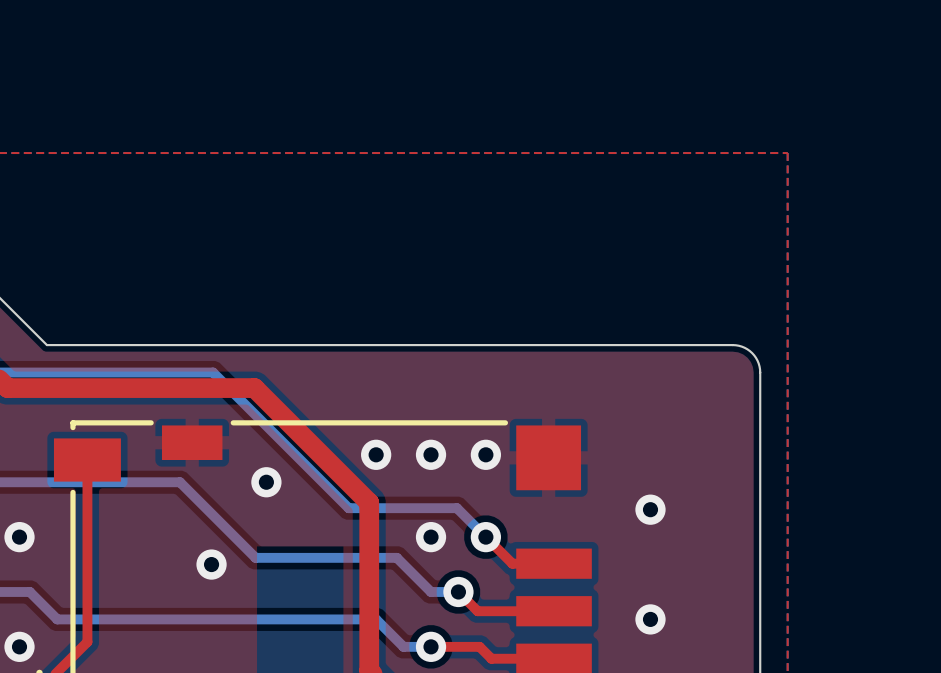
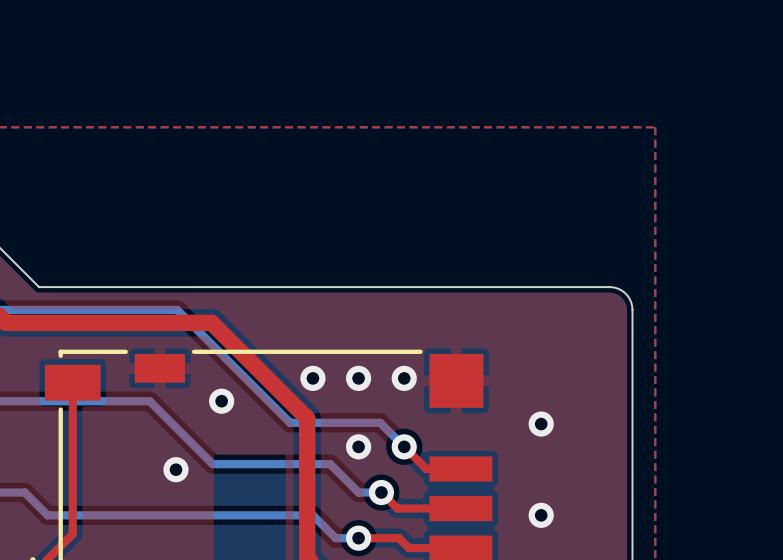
via: (19, 537) -> none
via: (19, 646) -> none

